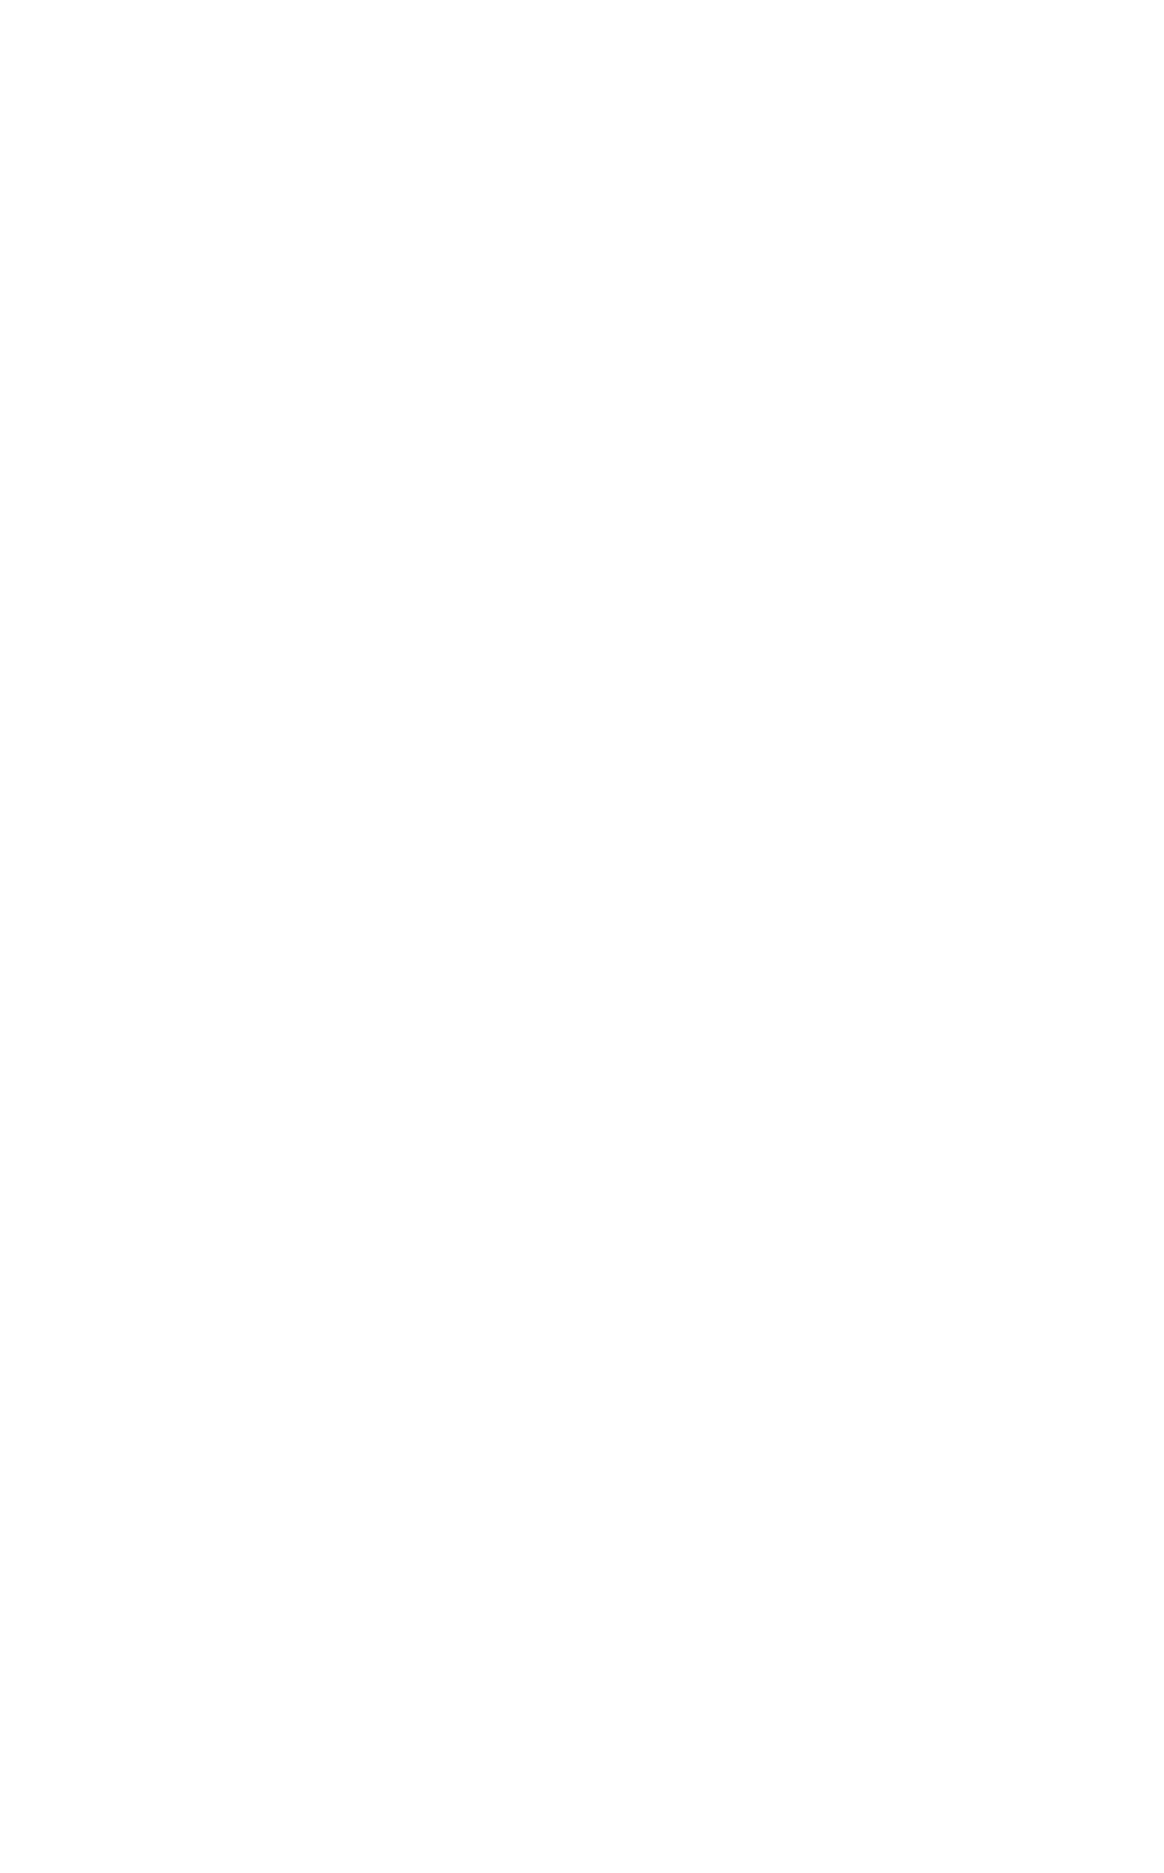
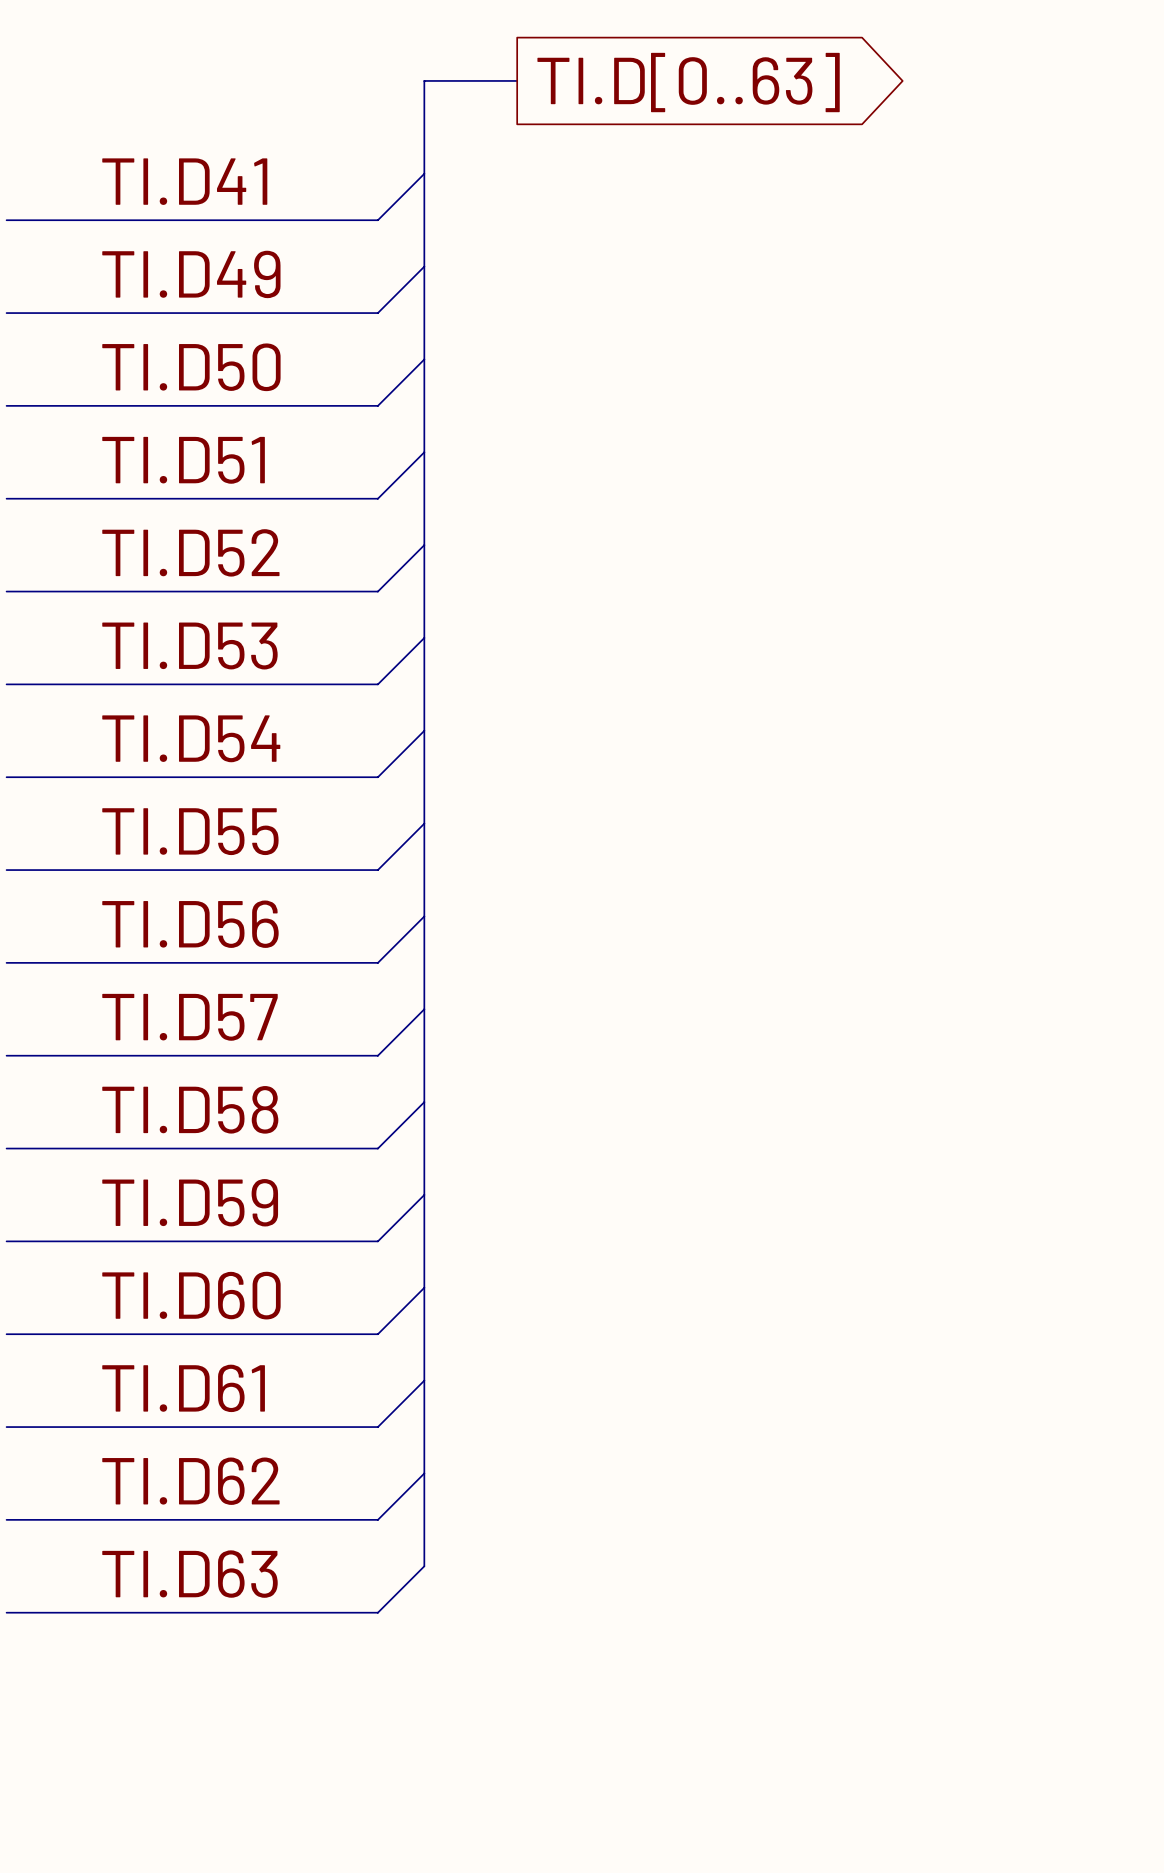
bus: none -> (517, 80) (424, 80) (424, 1566)
global label: none -> TI.D[0..63] (688, 82)
wire: none -> (424, 173) (377, 220) (6, 220)
label: none -> TI.D41 (184, 181)
wire: none -> (424, 266) (377, 313) (6, 313)
label: none -> TI.D49 (191, 274)
wire: none -> (424, 359) (377, 405) (6, 405)
label: none -> TI.D50 (191, 367)
wire: none -> (424, 452) (377, 498) (6, 498)
label: none -> TI.D51 (183, 460)
wire: none -> (424, 545) (377, 591) (6, 591)
label: none -> TI.D52 (190, 552)
wire: none -> (424, 637) (377, 684) (6, 684)
label: none -> TI.D53 (189, 646)
wire: none -> (424, 730) (377, 777) (6, 777)
label: none -> TI.D54 (191, 738)
wire: none -> (424, 823) (377, 870) (6, 870)
label: none -> TI.D55 (190, 831)
wire: none -> (424, 916) (377, 962) (6, 962)
label: none -> TI.D56 (190, 924)
wire: none -> (424, 1009) (377, 1055) (6, 1055)
label: none -> TI.D57 (189, 1017)
wire: none -> (424, 1102) (377, 1148) (6, 1148)
label: none -> TI.D58 (190, 1109)
wire: none -> (424, 1194) (377, 1241) (6, 1241)
label: none -> TI.D59 (190, 1202)
wire: none -> (424, 1287) (377, 1334) (6, 1334)
label: none -> TI.D60 (191, 1295)
wire: none -> (424, 1380) (377, 1427) (6, 1427)
label: none -> TI.D61 (183, 1388)
wire: none -> (424, 1473) (377, 1519) (6, 1519)
label: none -> TI.D62 (190, 1481)
wire: none -> (424, 1566) (377, 1612) (6, 1612)
label: none -> TI.D63 (189, 1574)

